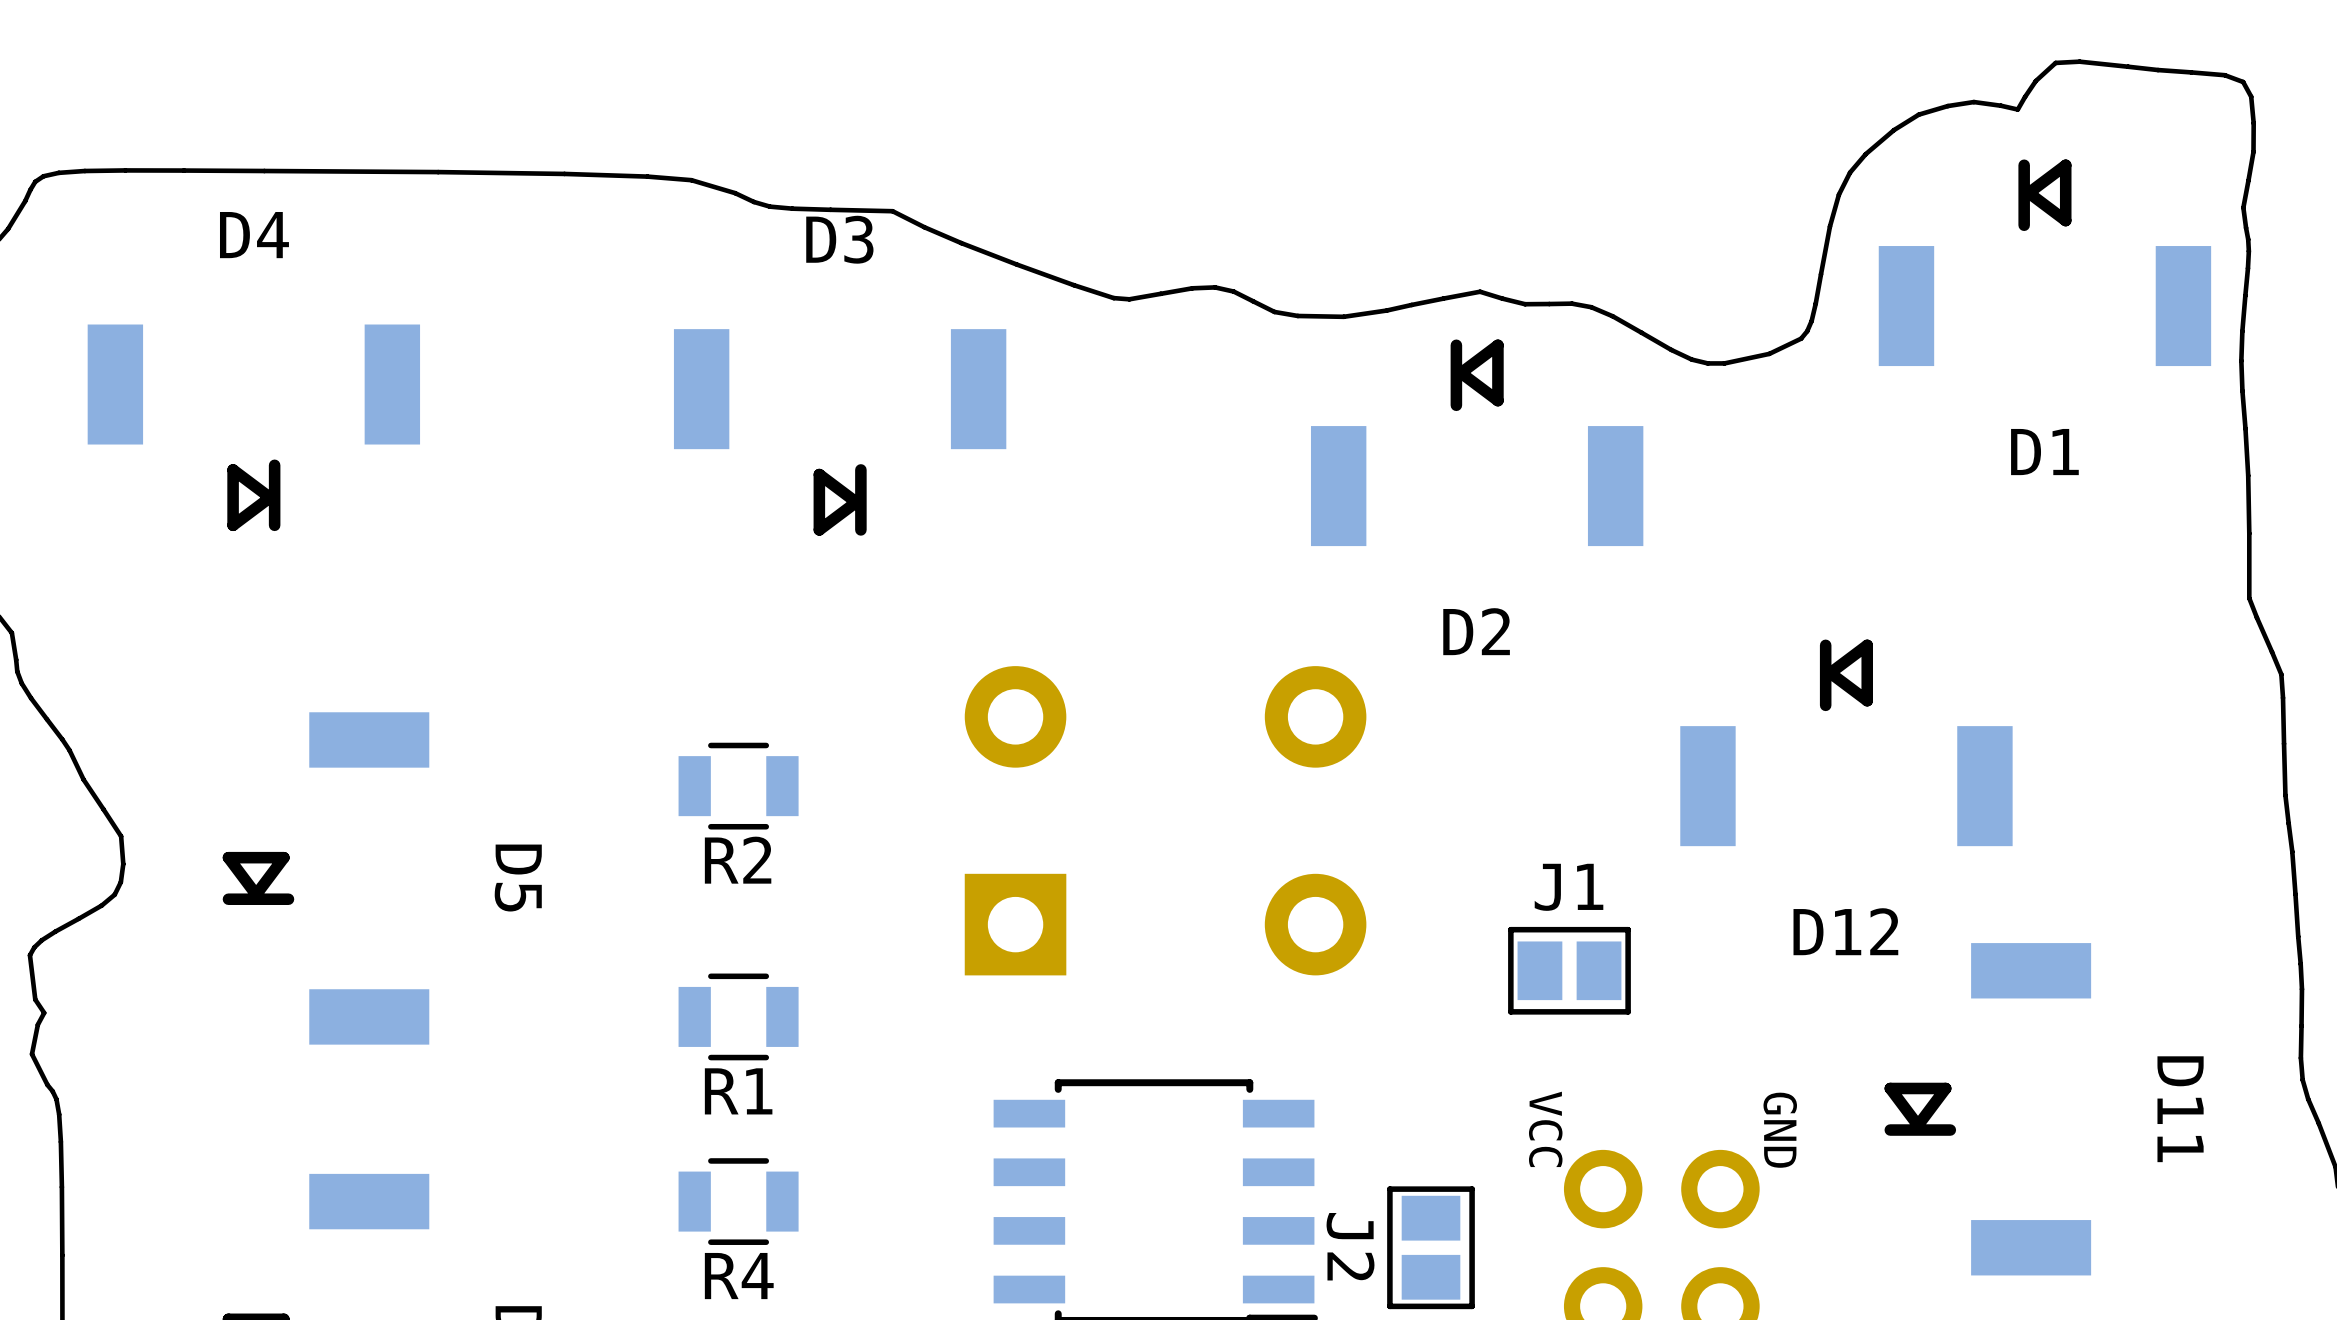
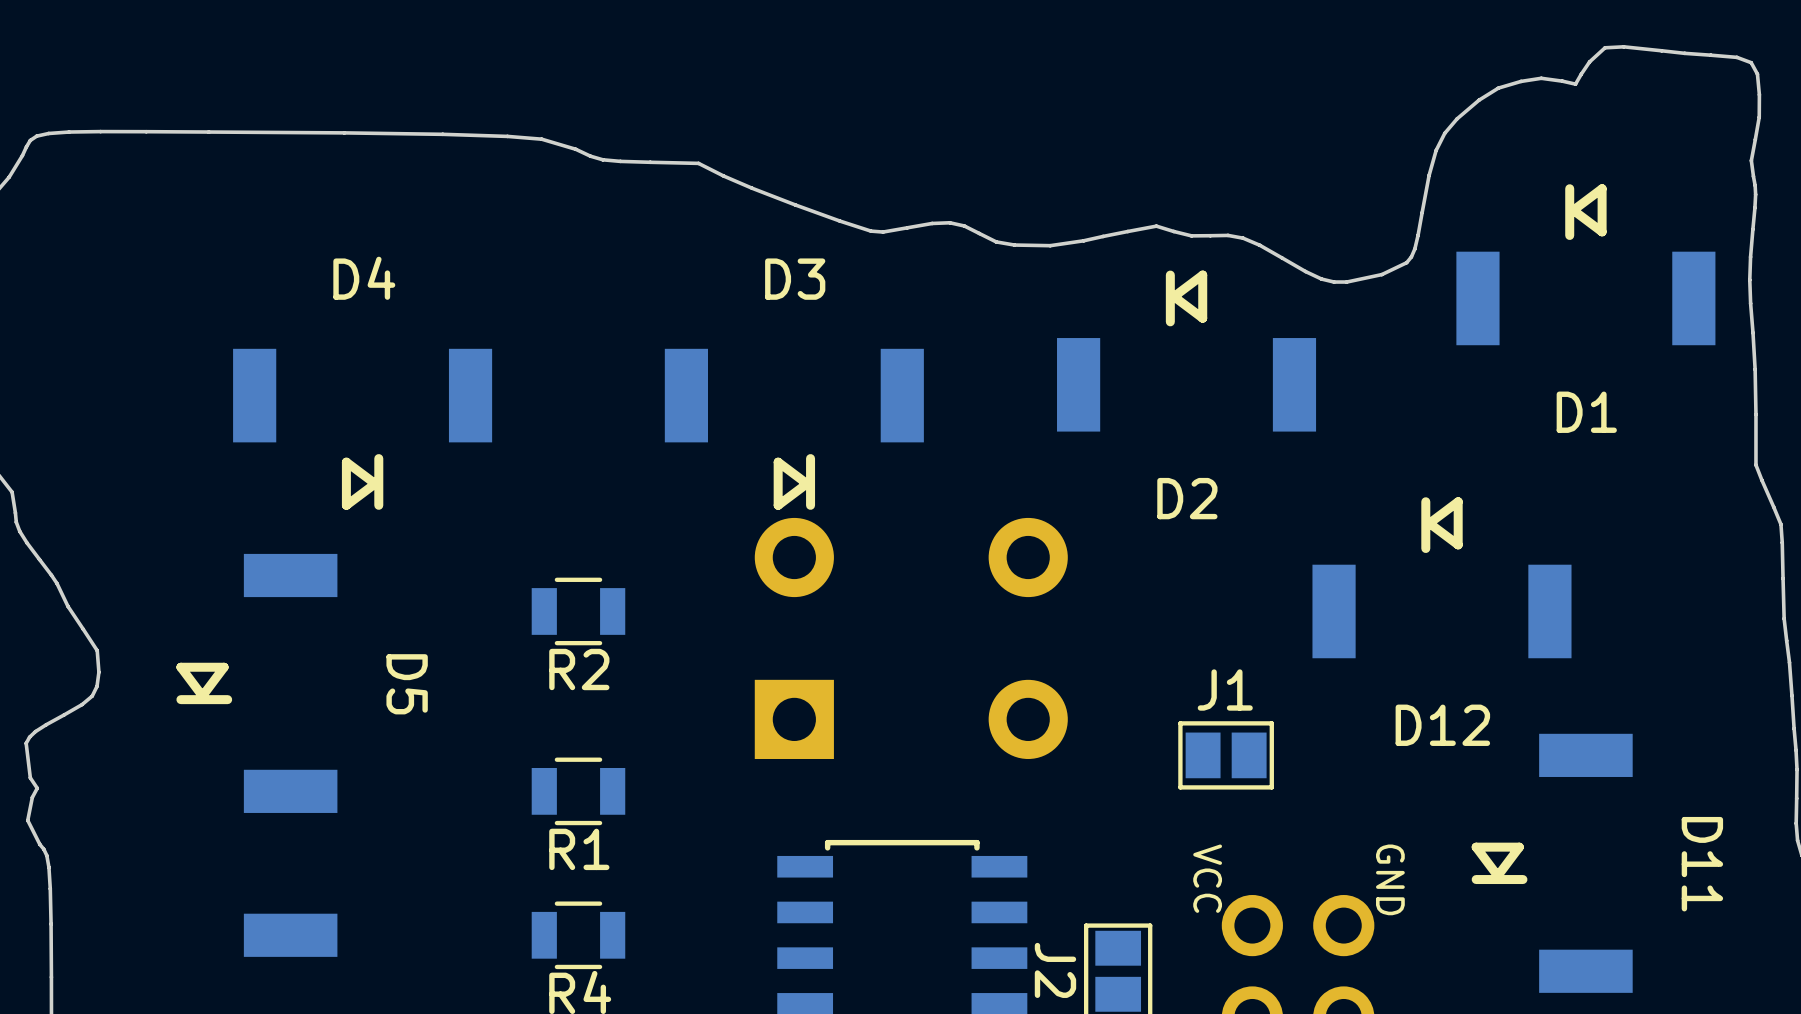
D1 position: (2044, 262) -> (1585, 264)
D4 position: (253, 427) -> (362, 429)
D3 position: (840, 432) -> (794, 429)
D2 position: (1477, 442) -> (1186, 351)

